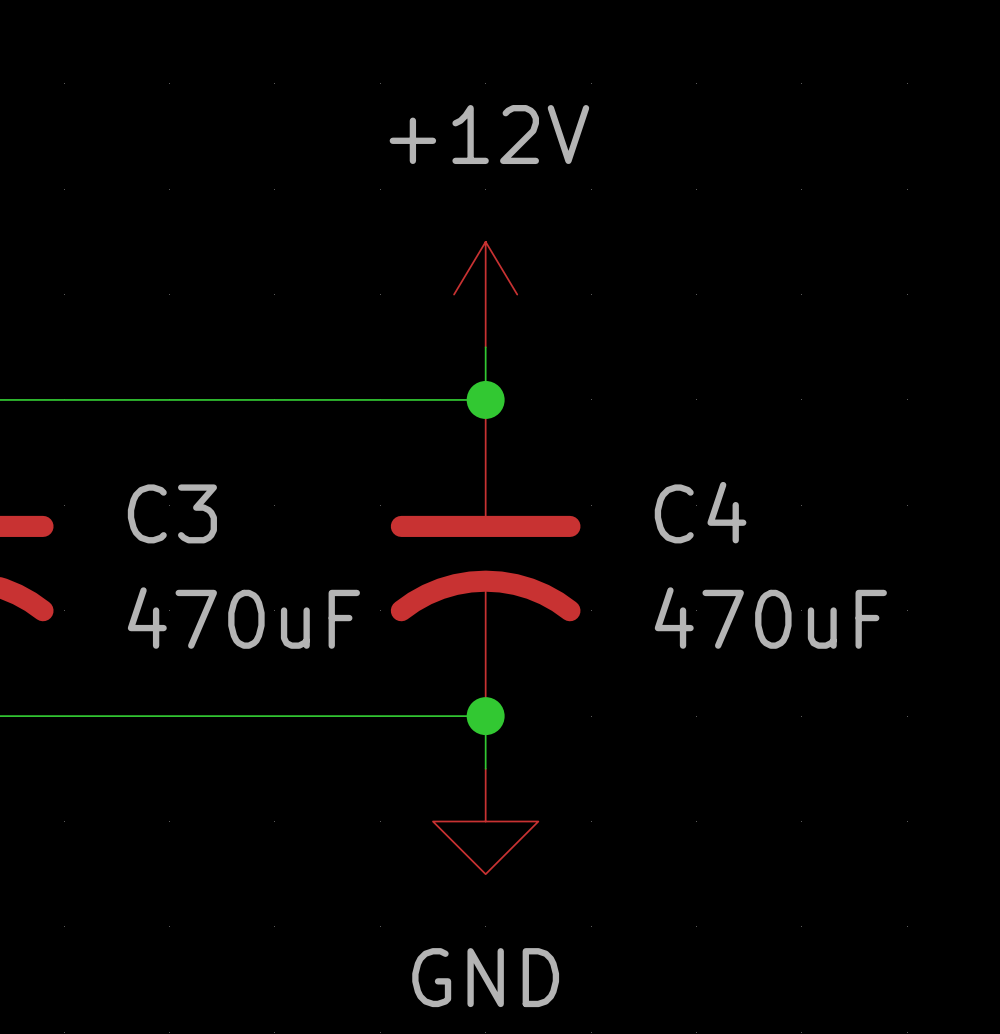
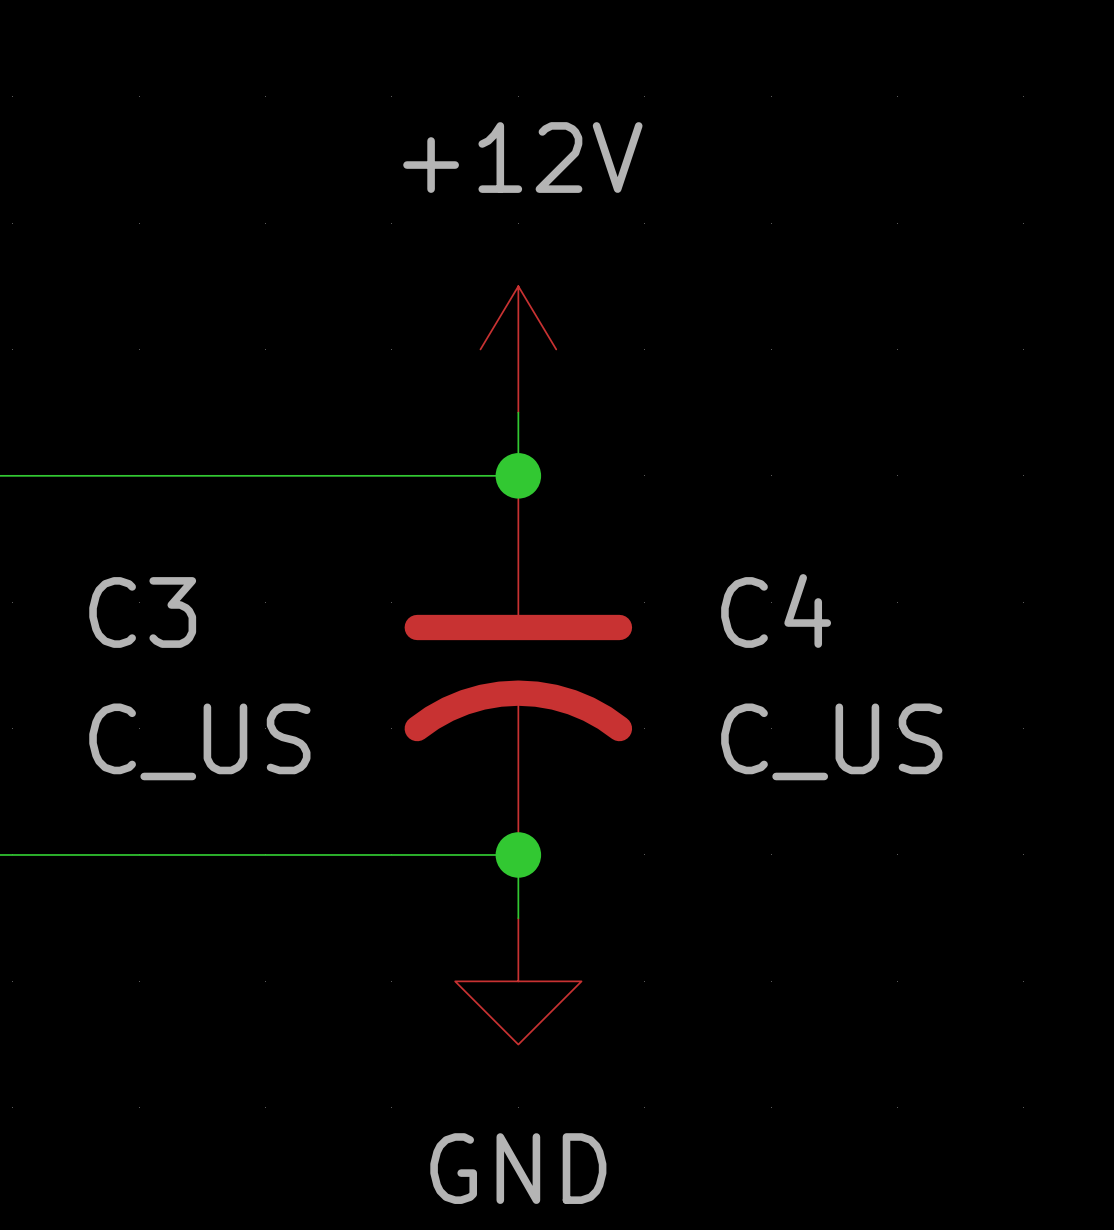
C3 value: 470uF (243, 618) -> C_US (199, 741)
C4 value: 470uF (770, 618) -> C_US (831, 741)

